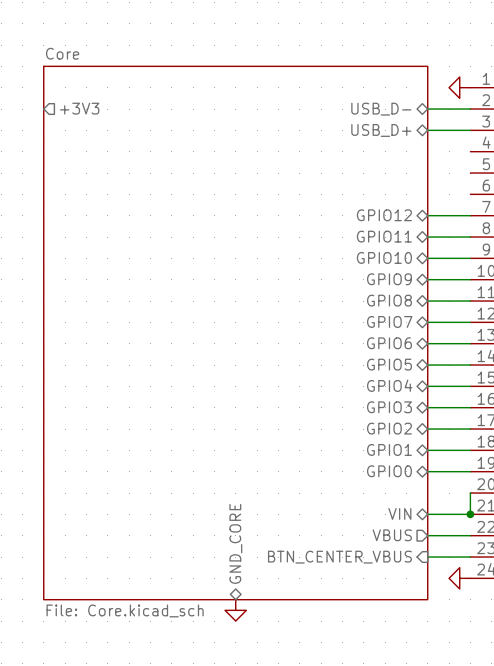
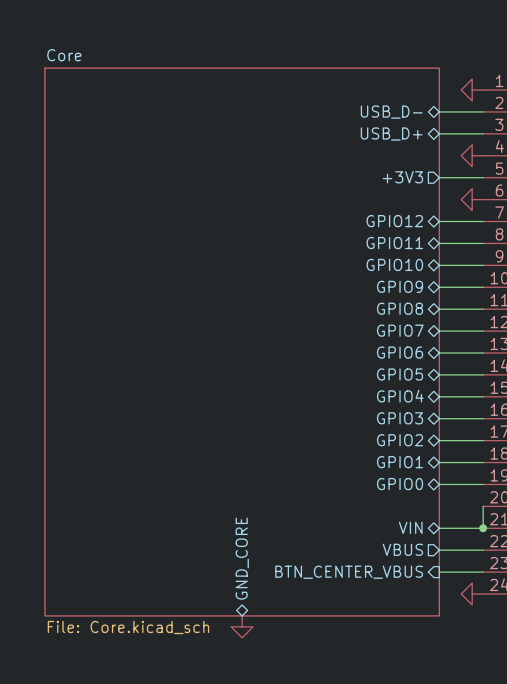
sheet pin: +3V3 (79, 108) -> none
power symbol: none -> (472, 155)
sheet pin: none -> +3V3 (402, 177)
wire: none -> (439, 177) (483, 177)
power symbol: none -> (472, 199)

